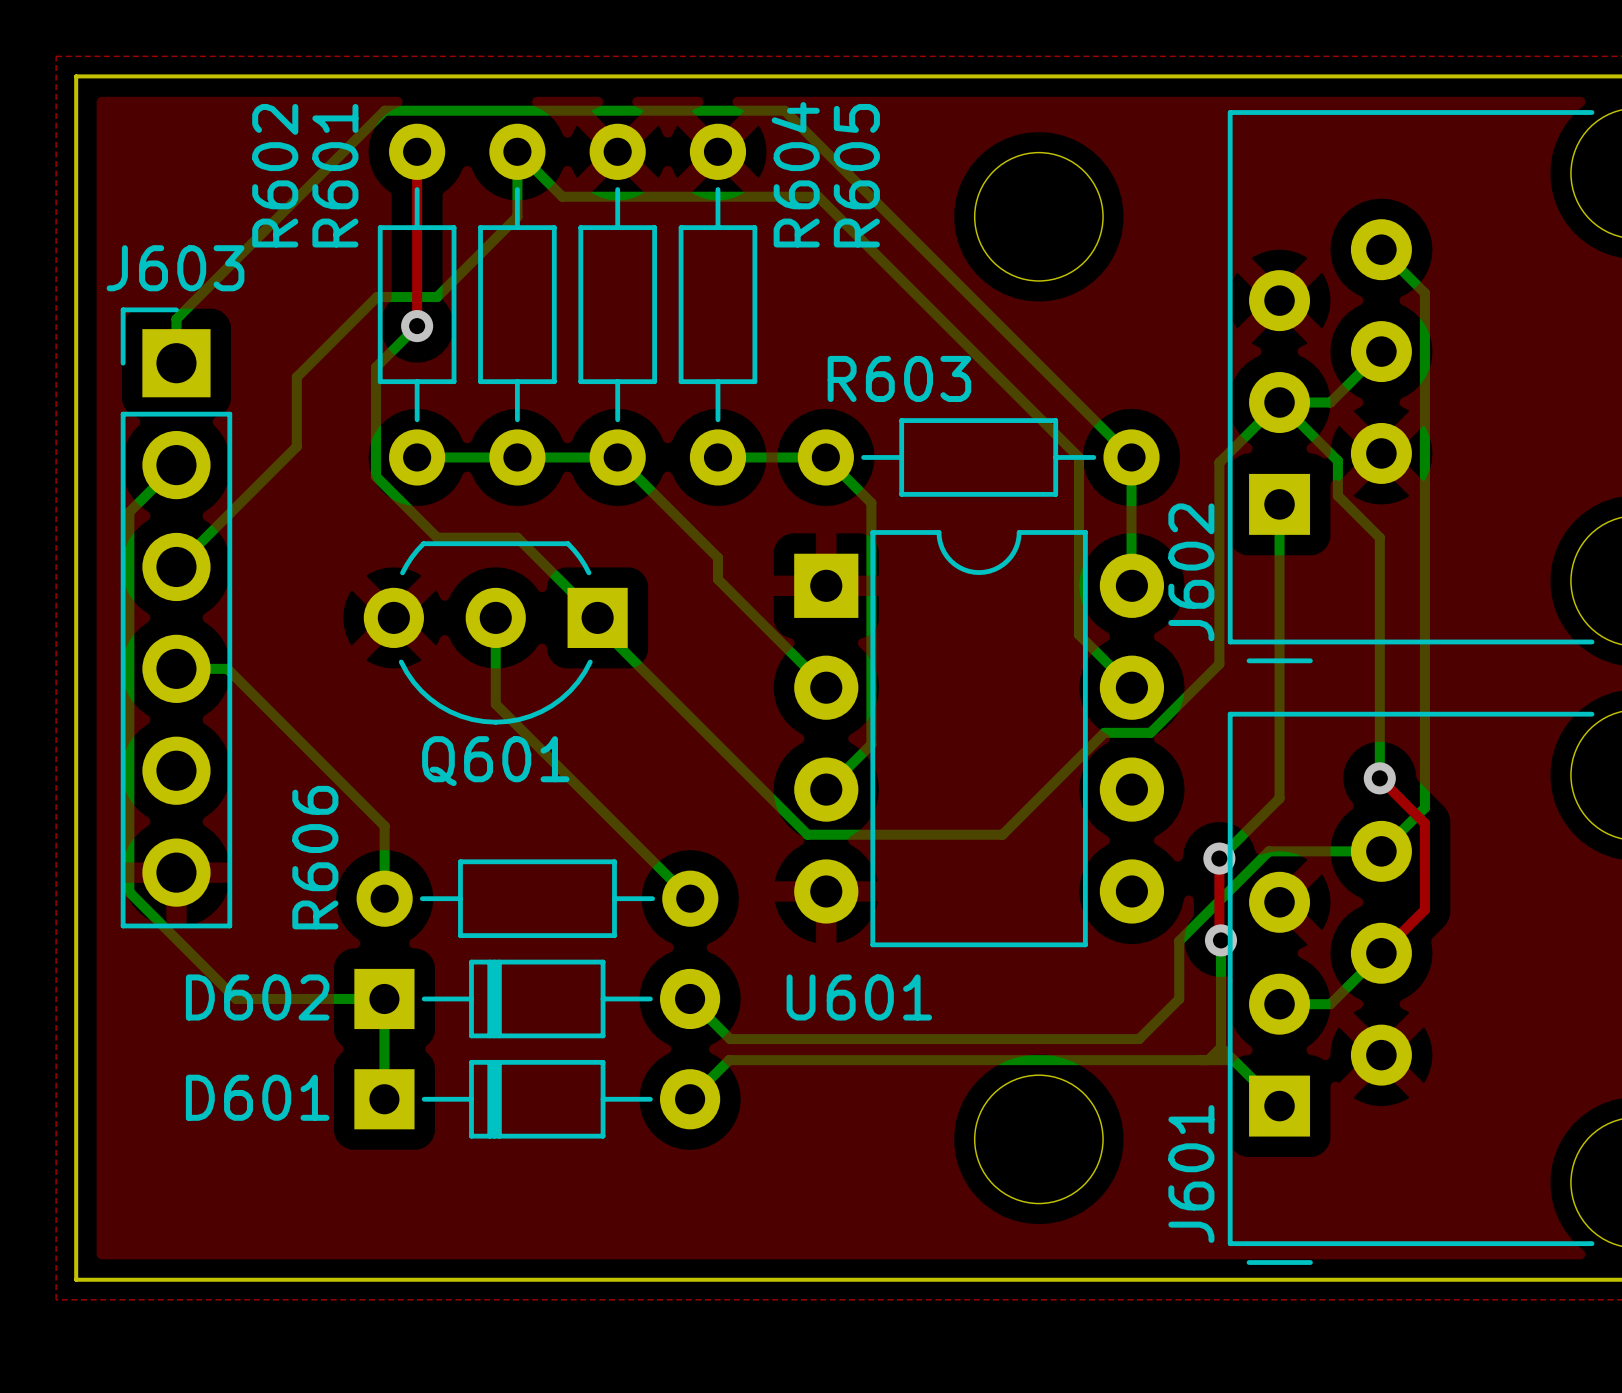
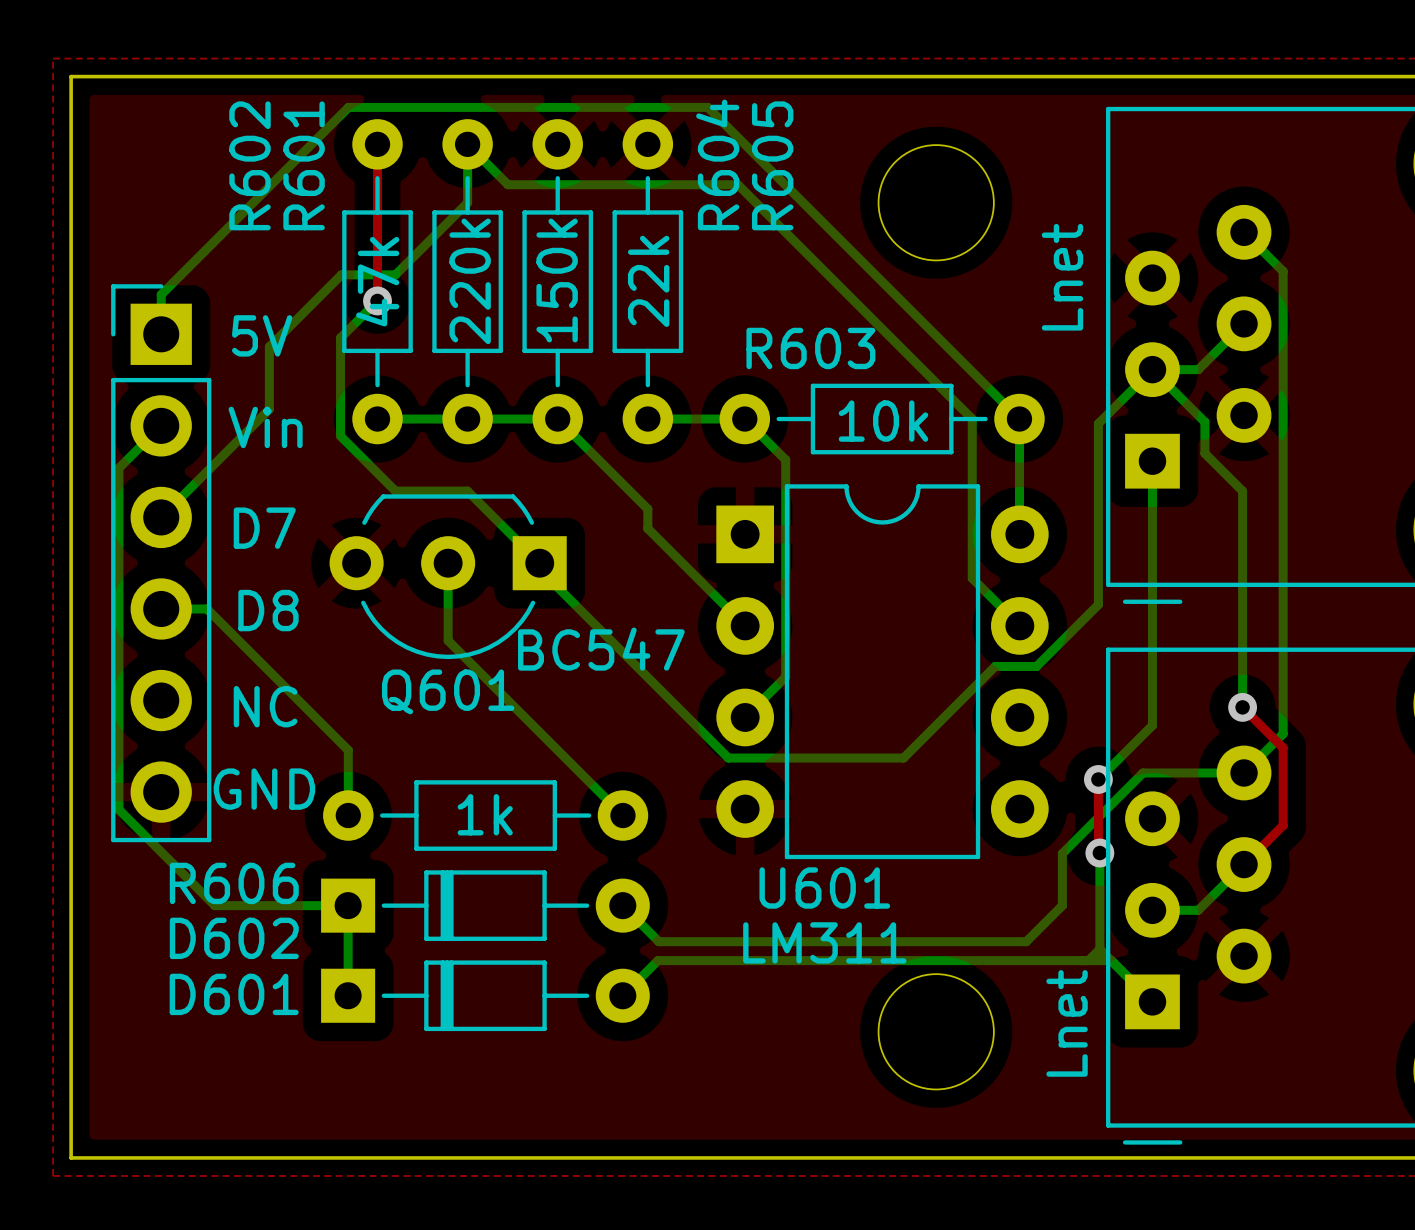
J603 name: J603 (175, 268) -> none
text: none -> Lnet (1062, 277)
R604 value: none -> 150k (557, 280)
R602 value: none -> 47k (377, 281)
R601 value: none -> 220k (470, 281)
R605 value: none -> 22k (648, 281)
text: none -> 5V (262, 335)
R603 value: none -> 10k (883, 421)
text: none -> Vin (265, 427)
J602 name: J602 (1191, 572) -> none
text: none -> D7 (264, 528)
text: none -> D8 (268, 610)
Q601 value: none -> BC547 (601, 649)
text: none -> NC (265, 706)
R606 name rotation: 0° (315, 857) -> 90° clockwise (234, 883)
text: none -> GND (264, 789)
R606 value: none -> 1k (485, 814)
D602 name position: D602 (257, 997) -> D602 (234, 938)
U601 name position: U601 (859, 997) -> U601 (824, 888)
U601 value: none -> LM311 (824, 942)
text: none -> Lnet (1067, 1023)
J601 name: J601 (1191, 1174) -> none

